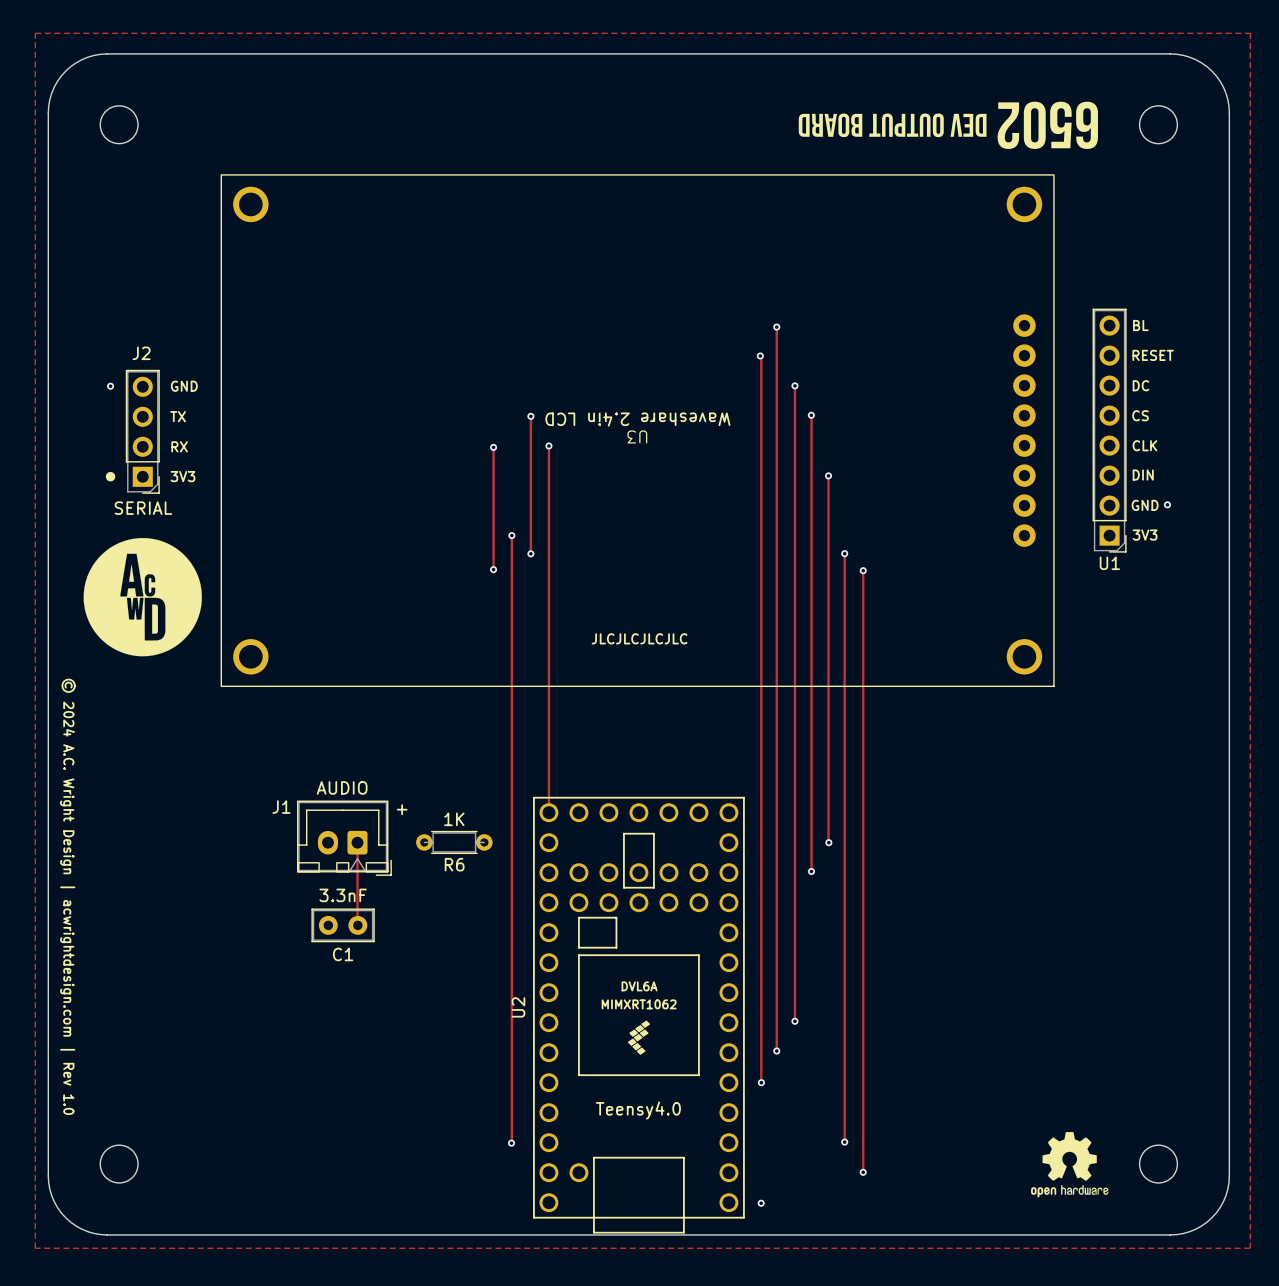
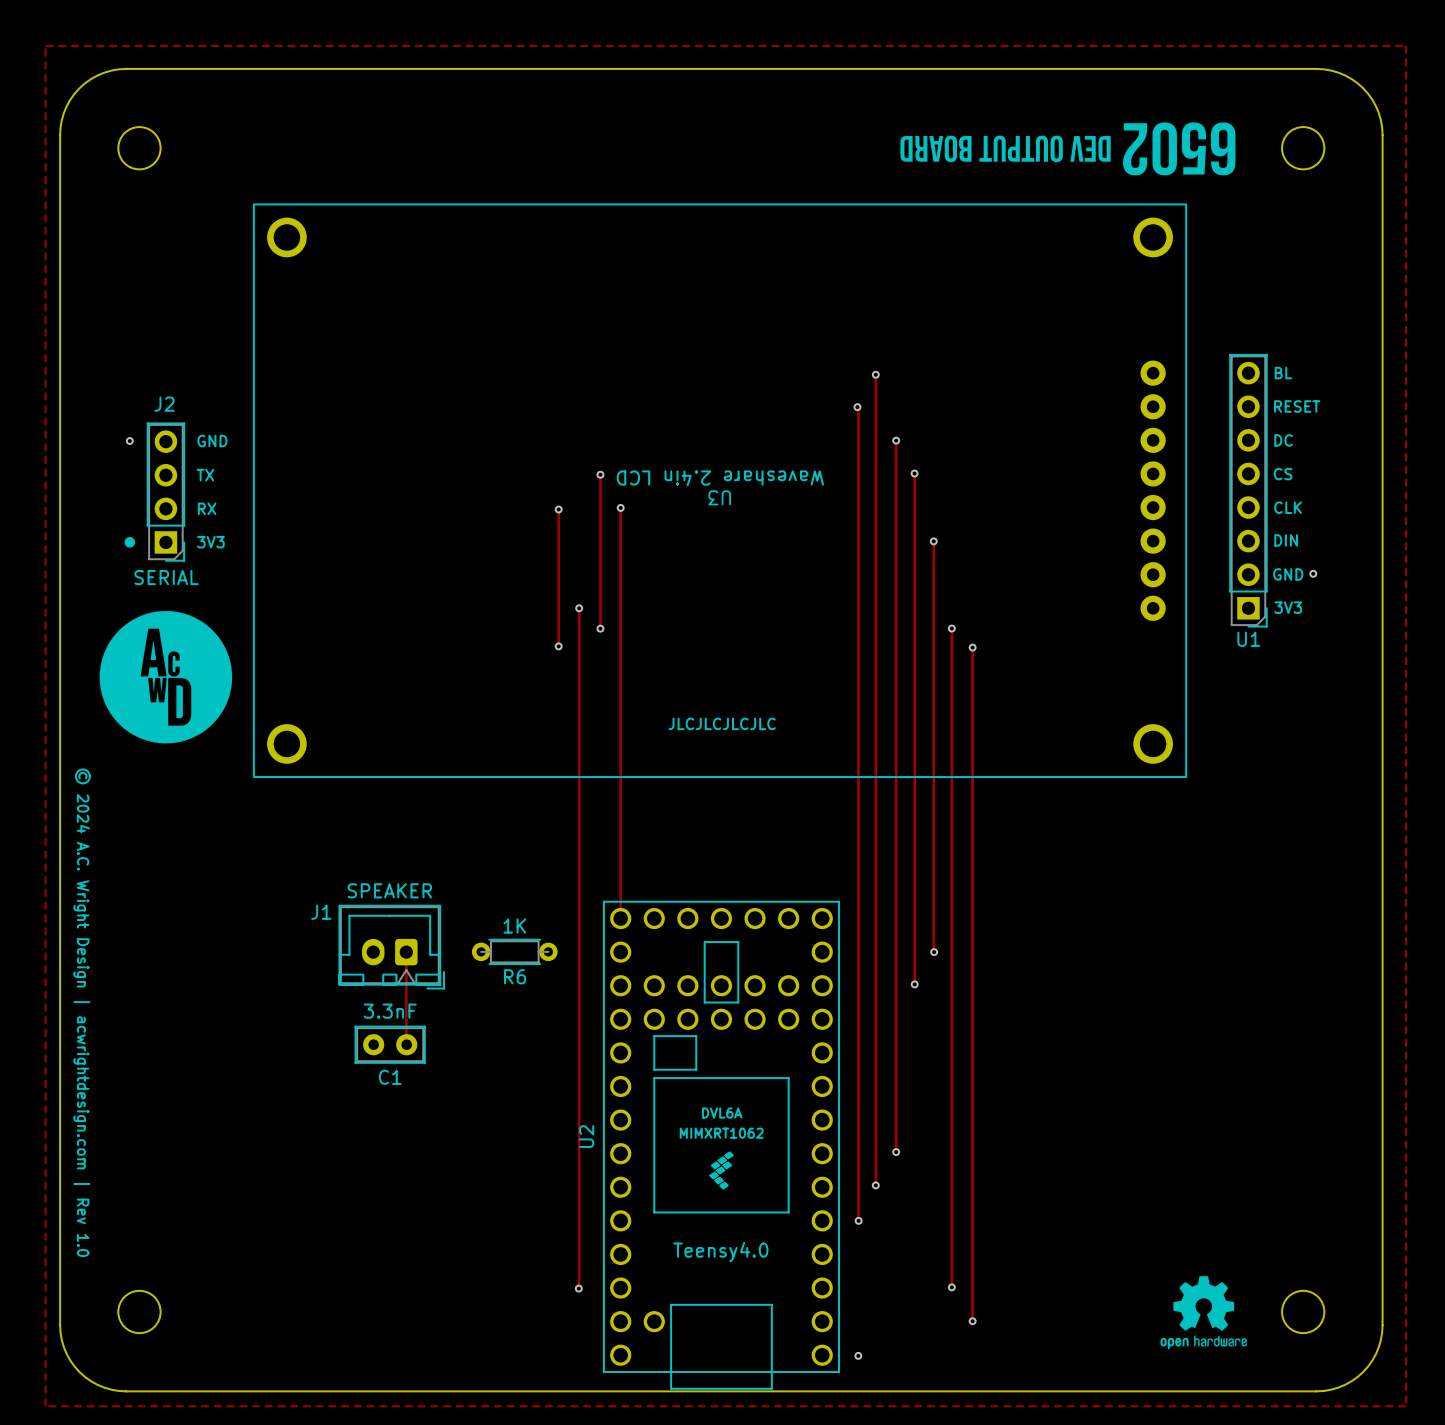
J1 value: AUDIO (342, 787) -> SPEAKER (389, 890)
text: + (402, 809) -> none

